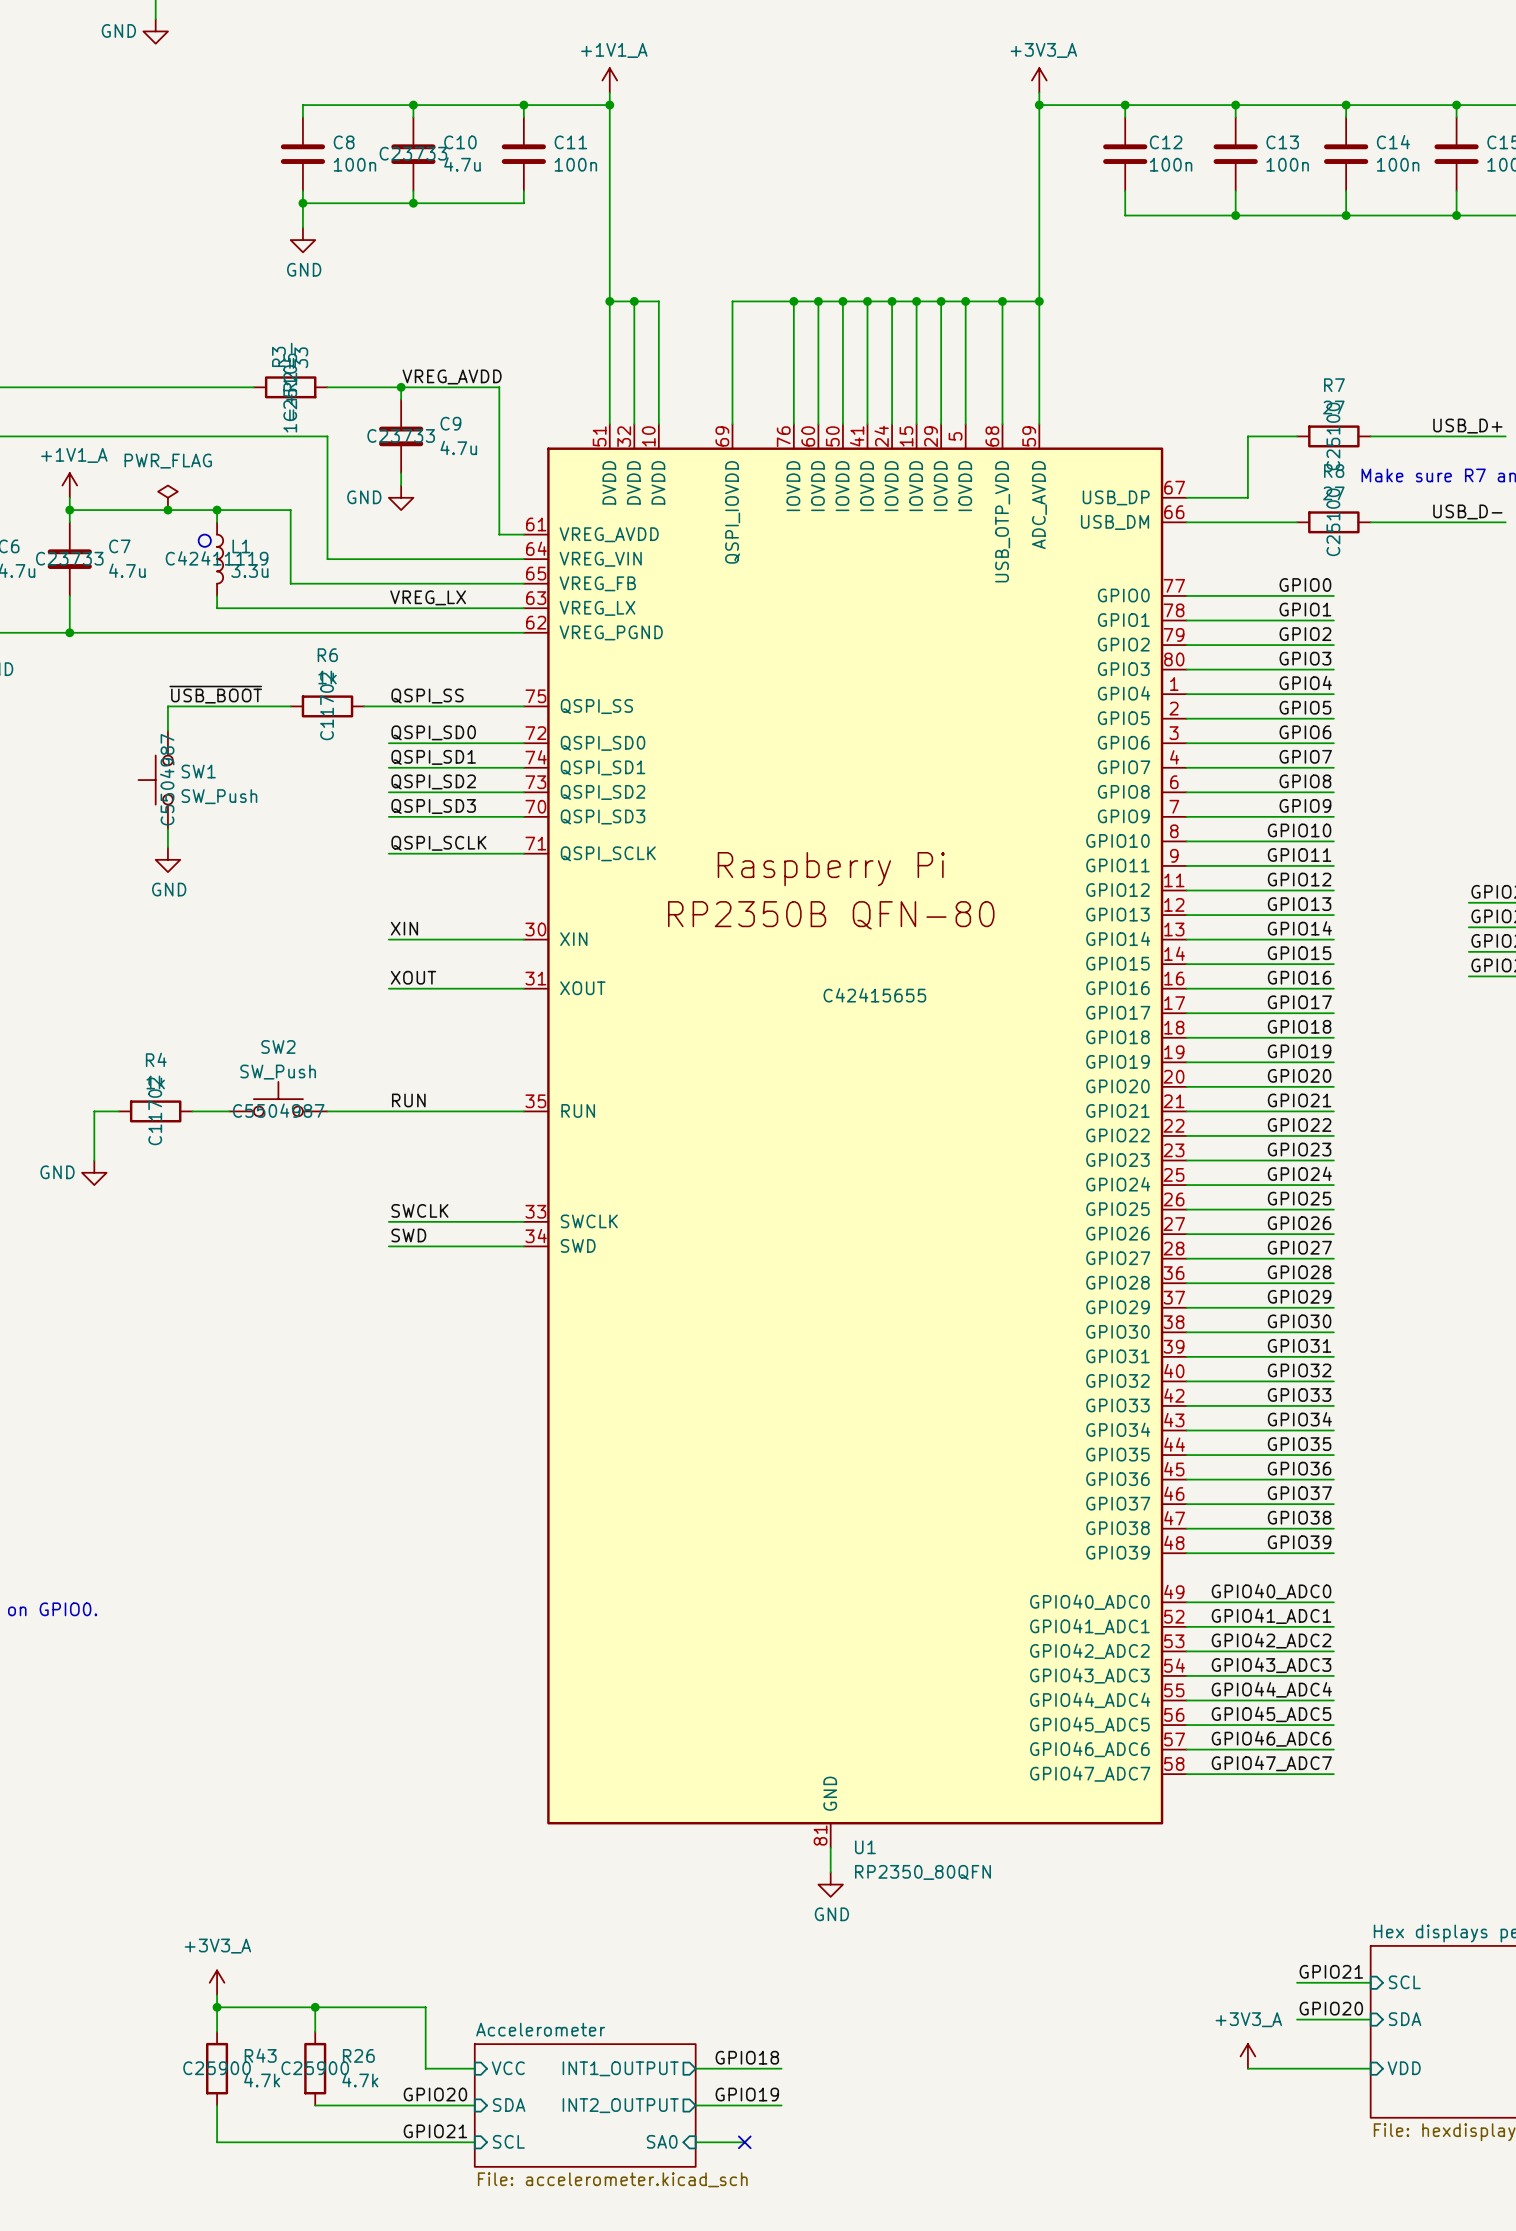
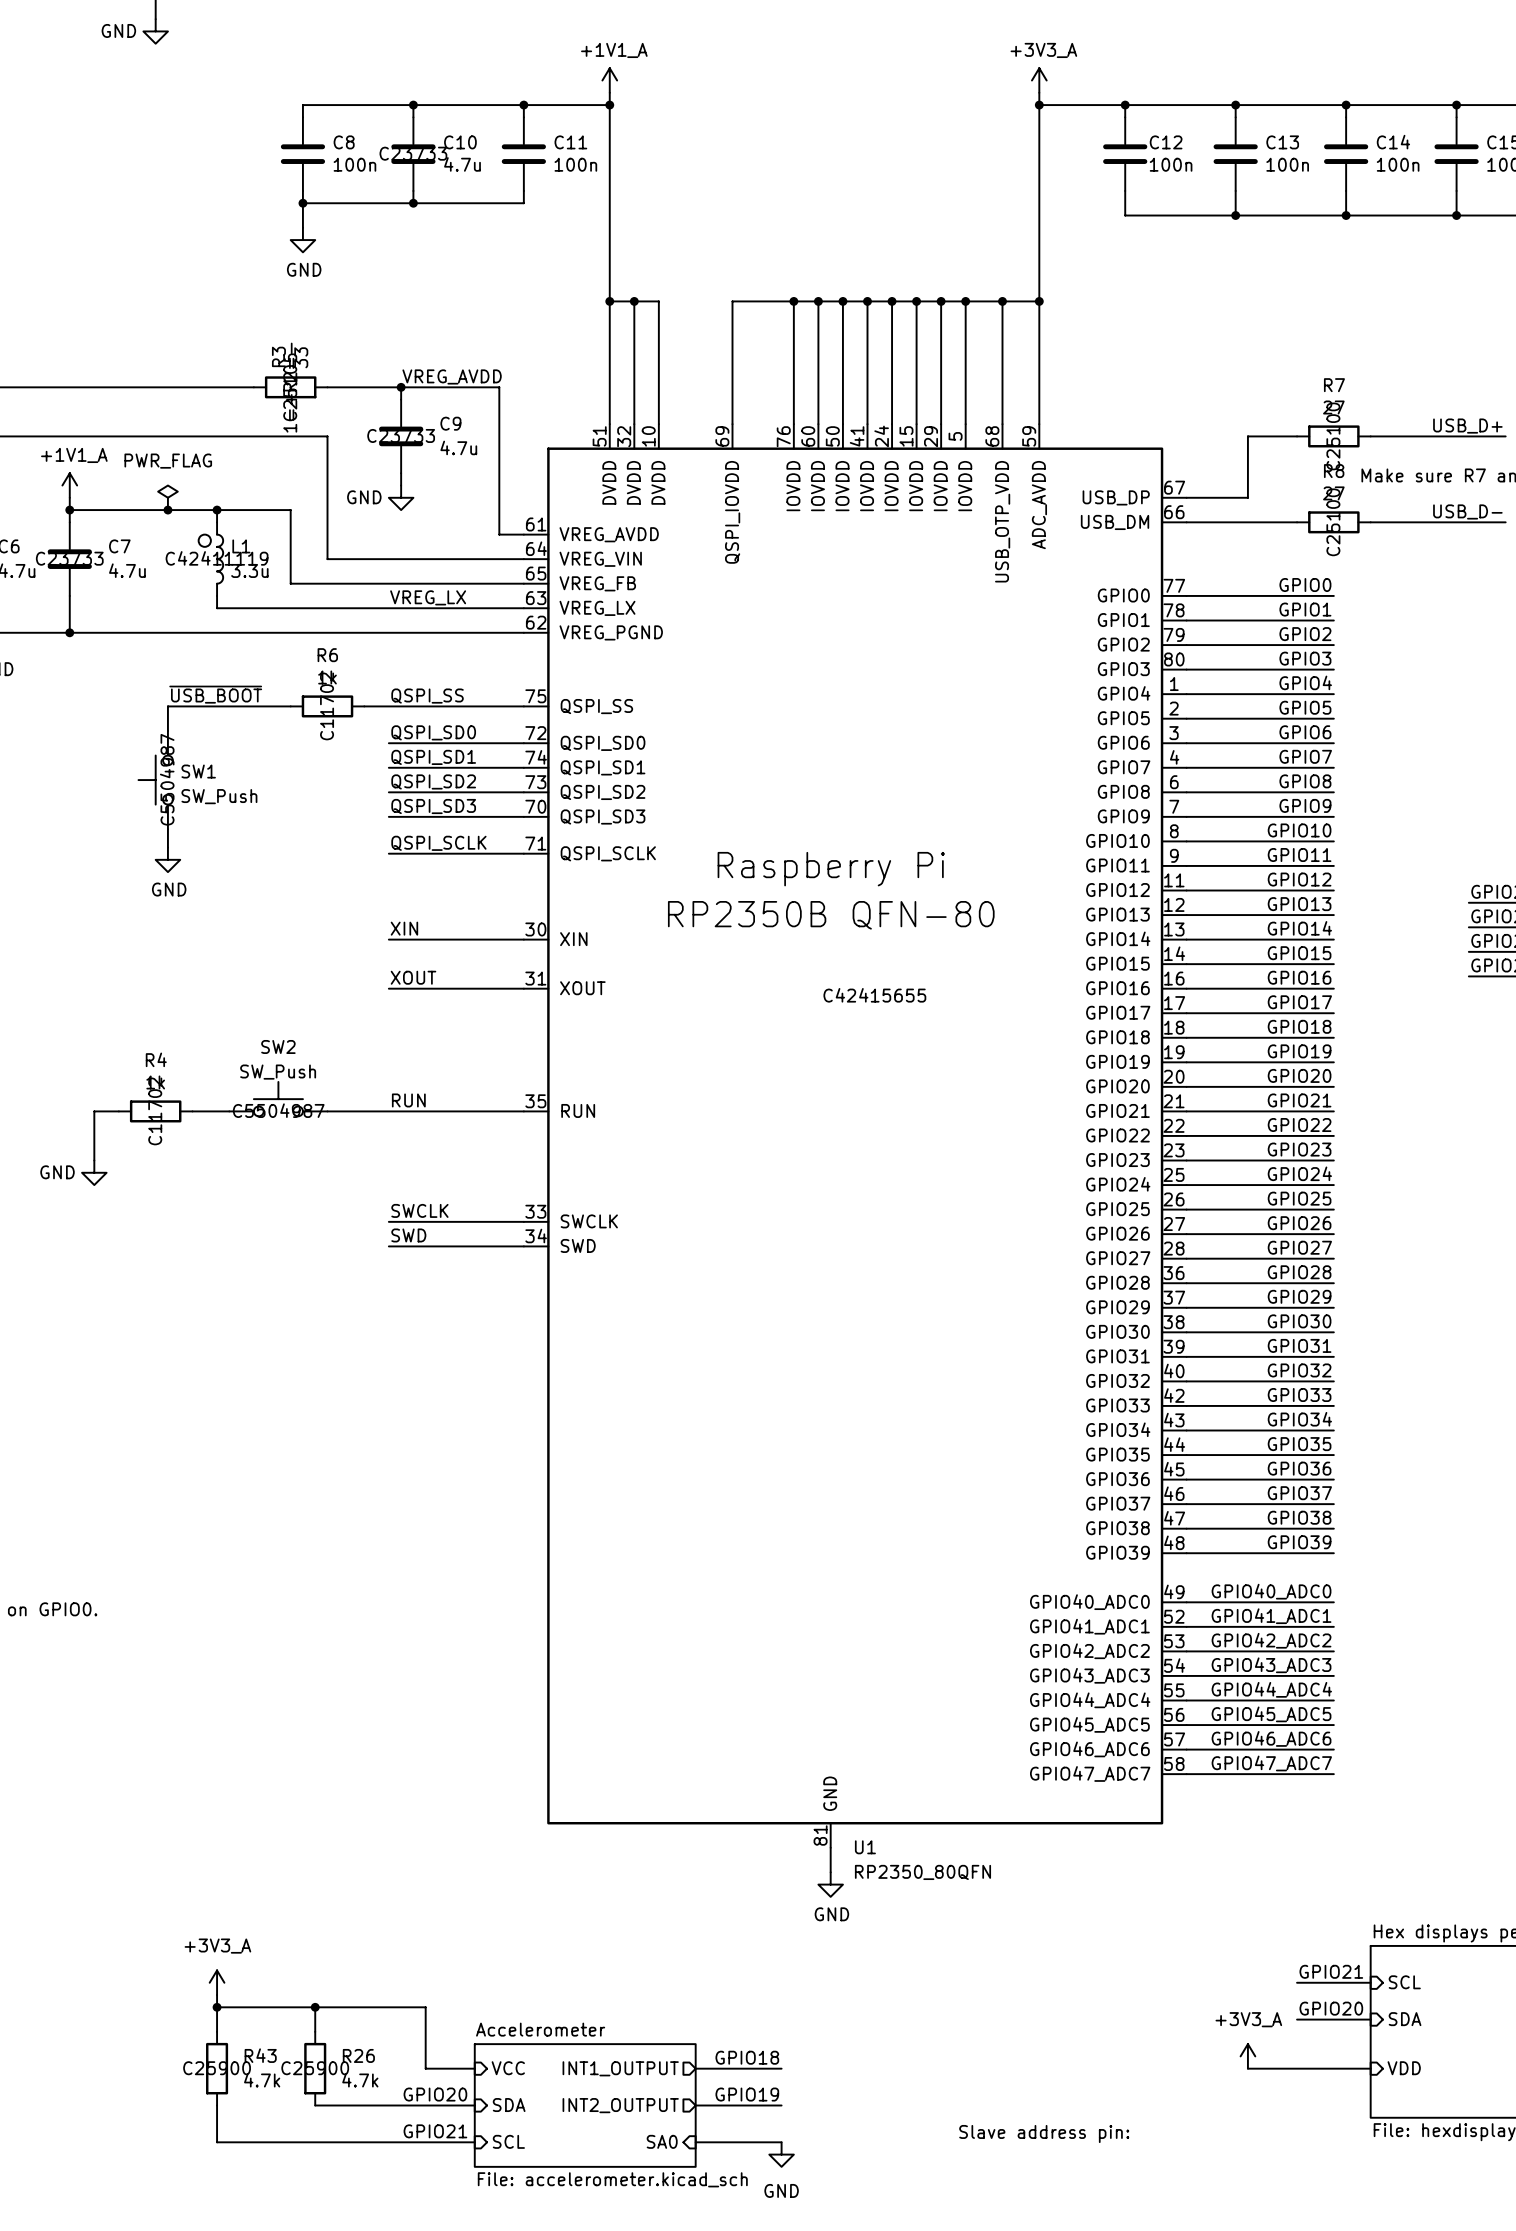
text: none -> Slave address pin: (1044, 2133)
wire: none -> (744, 2142) (781, 2142)
no-connect mark: (744, 2142) -> none
power symbol: none -> GND (781, 2154)

